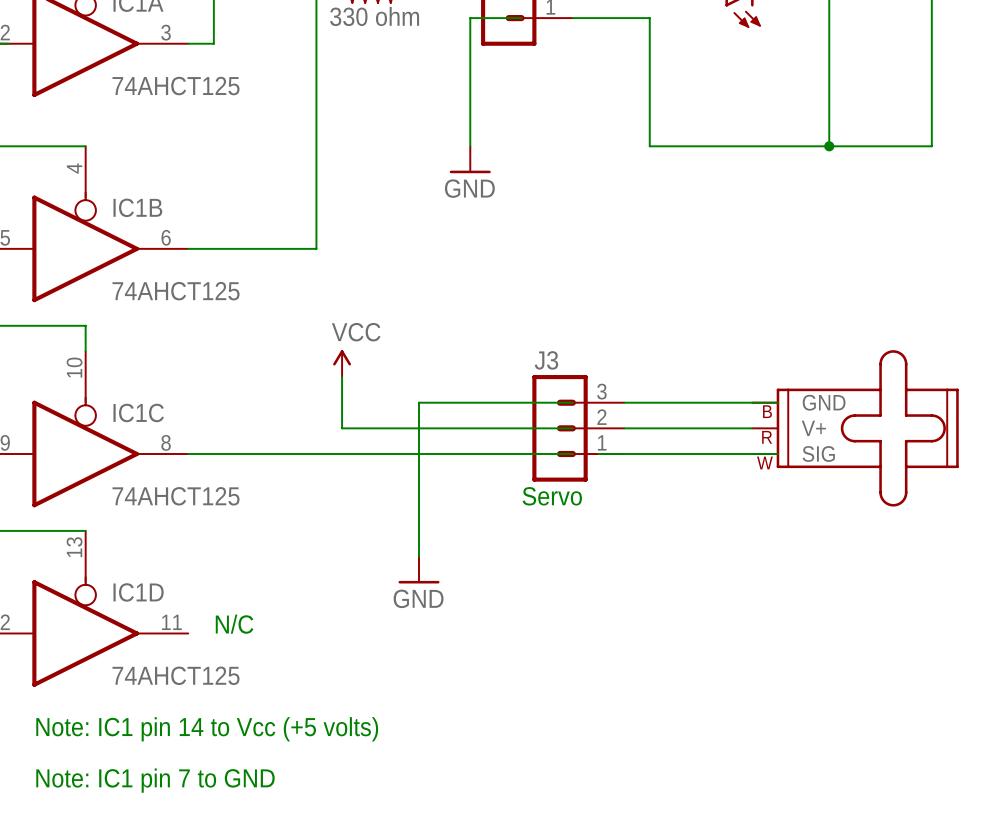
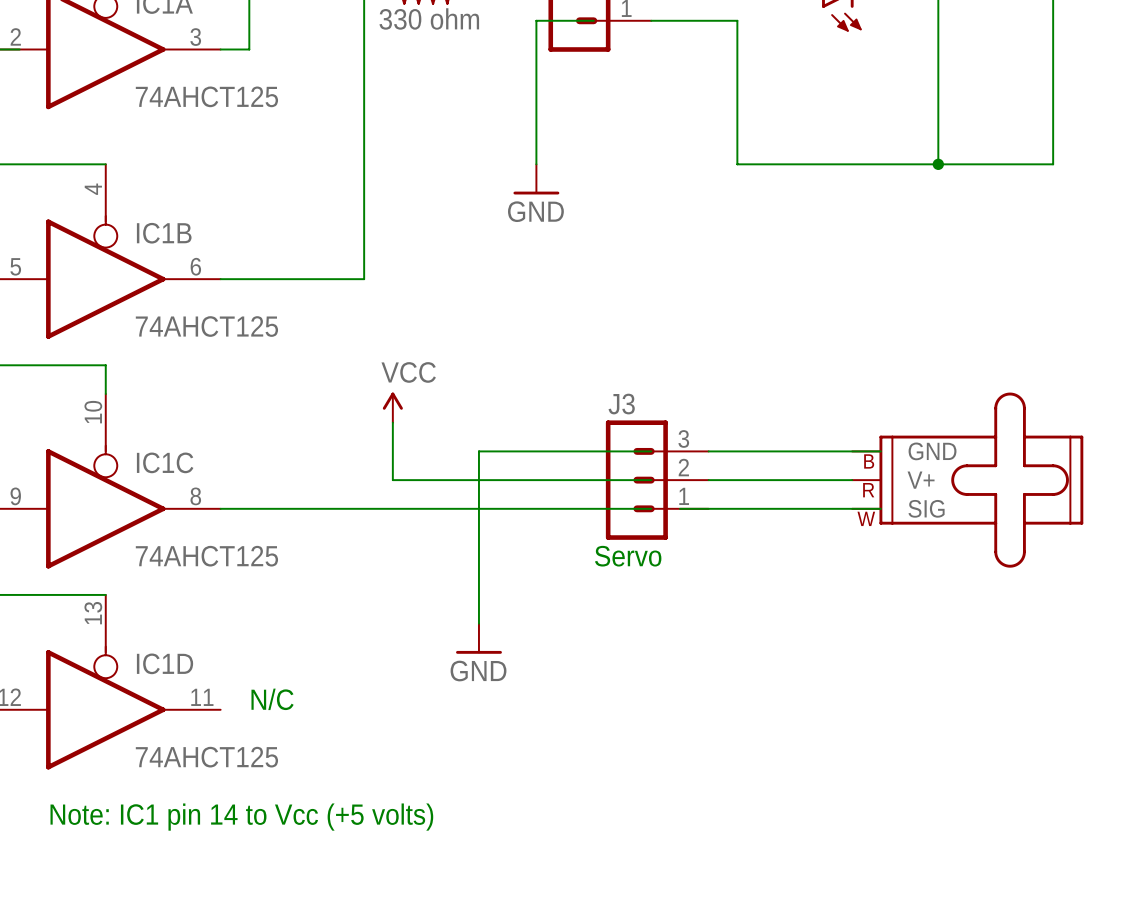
text: Note: IC1 pin 7 to GND (155, 780) -> none

